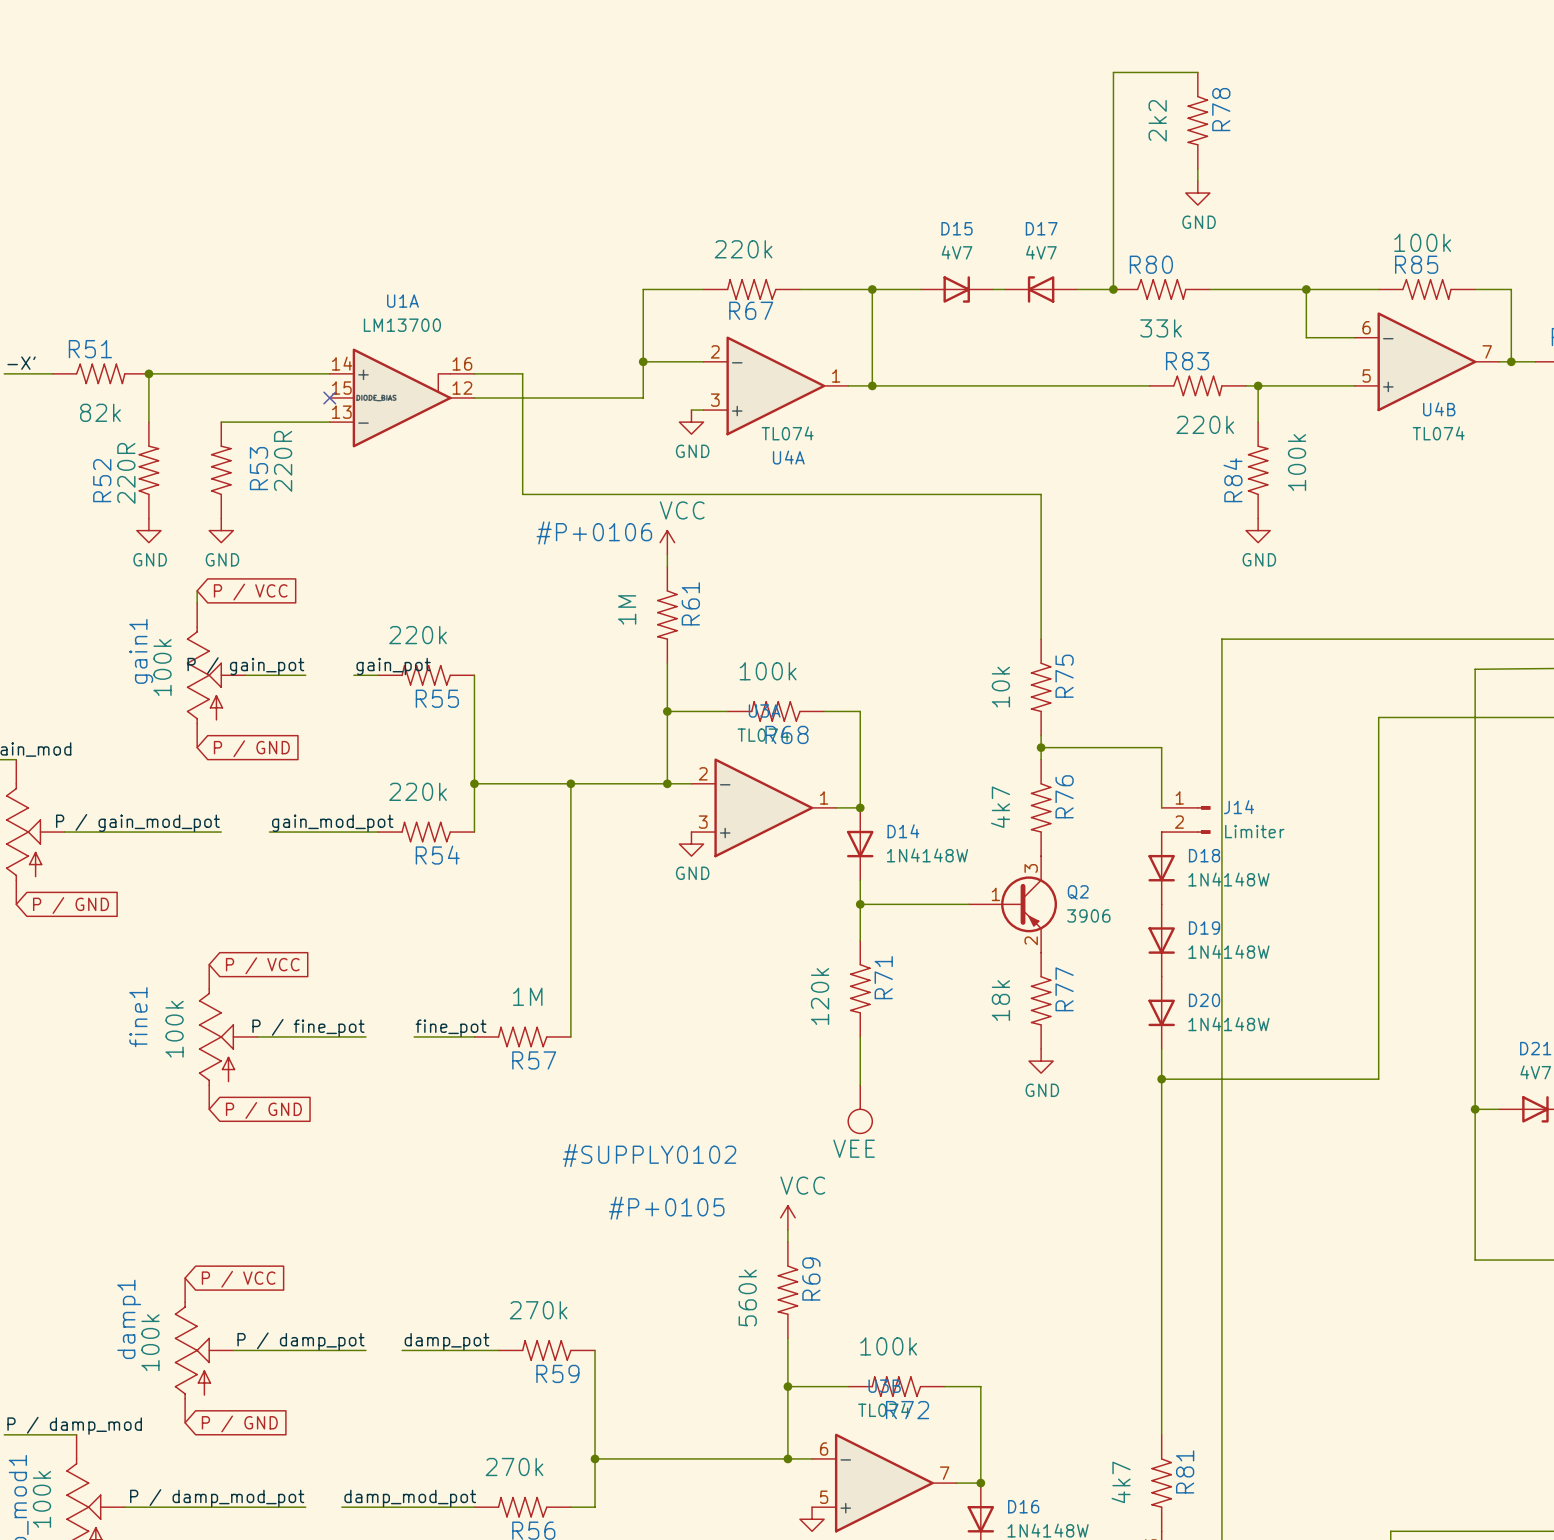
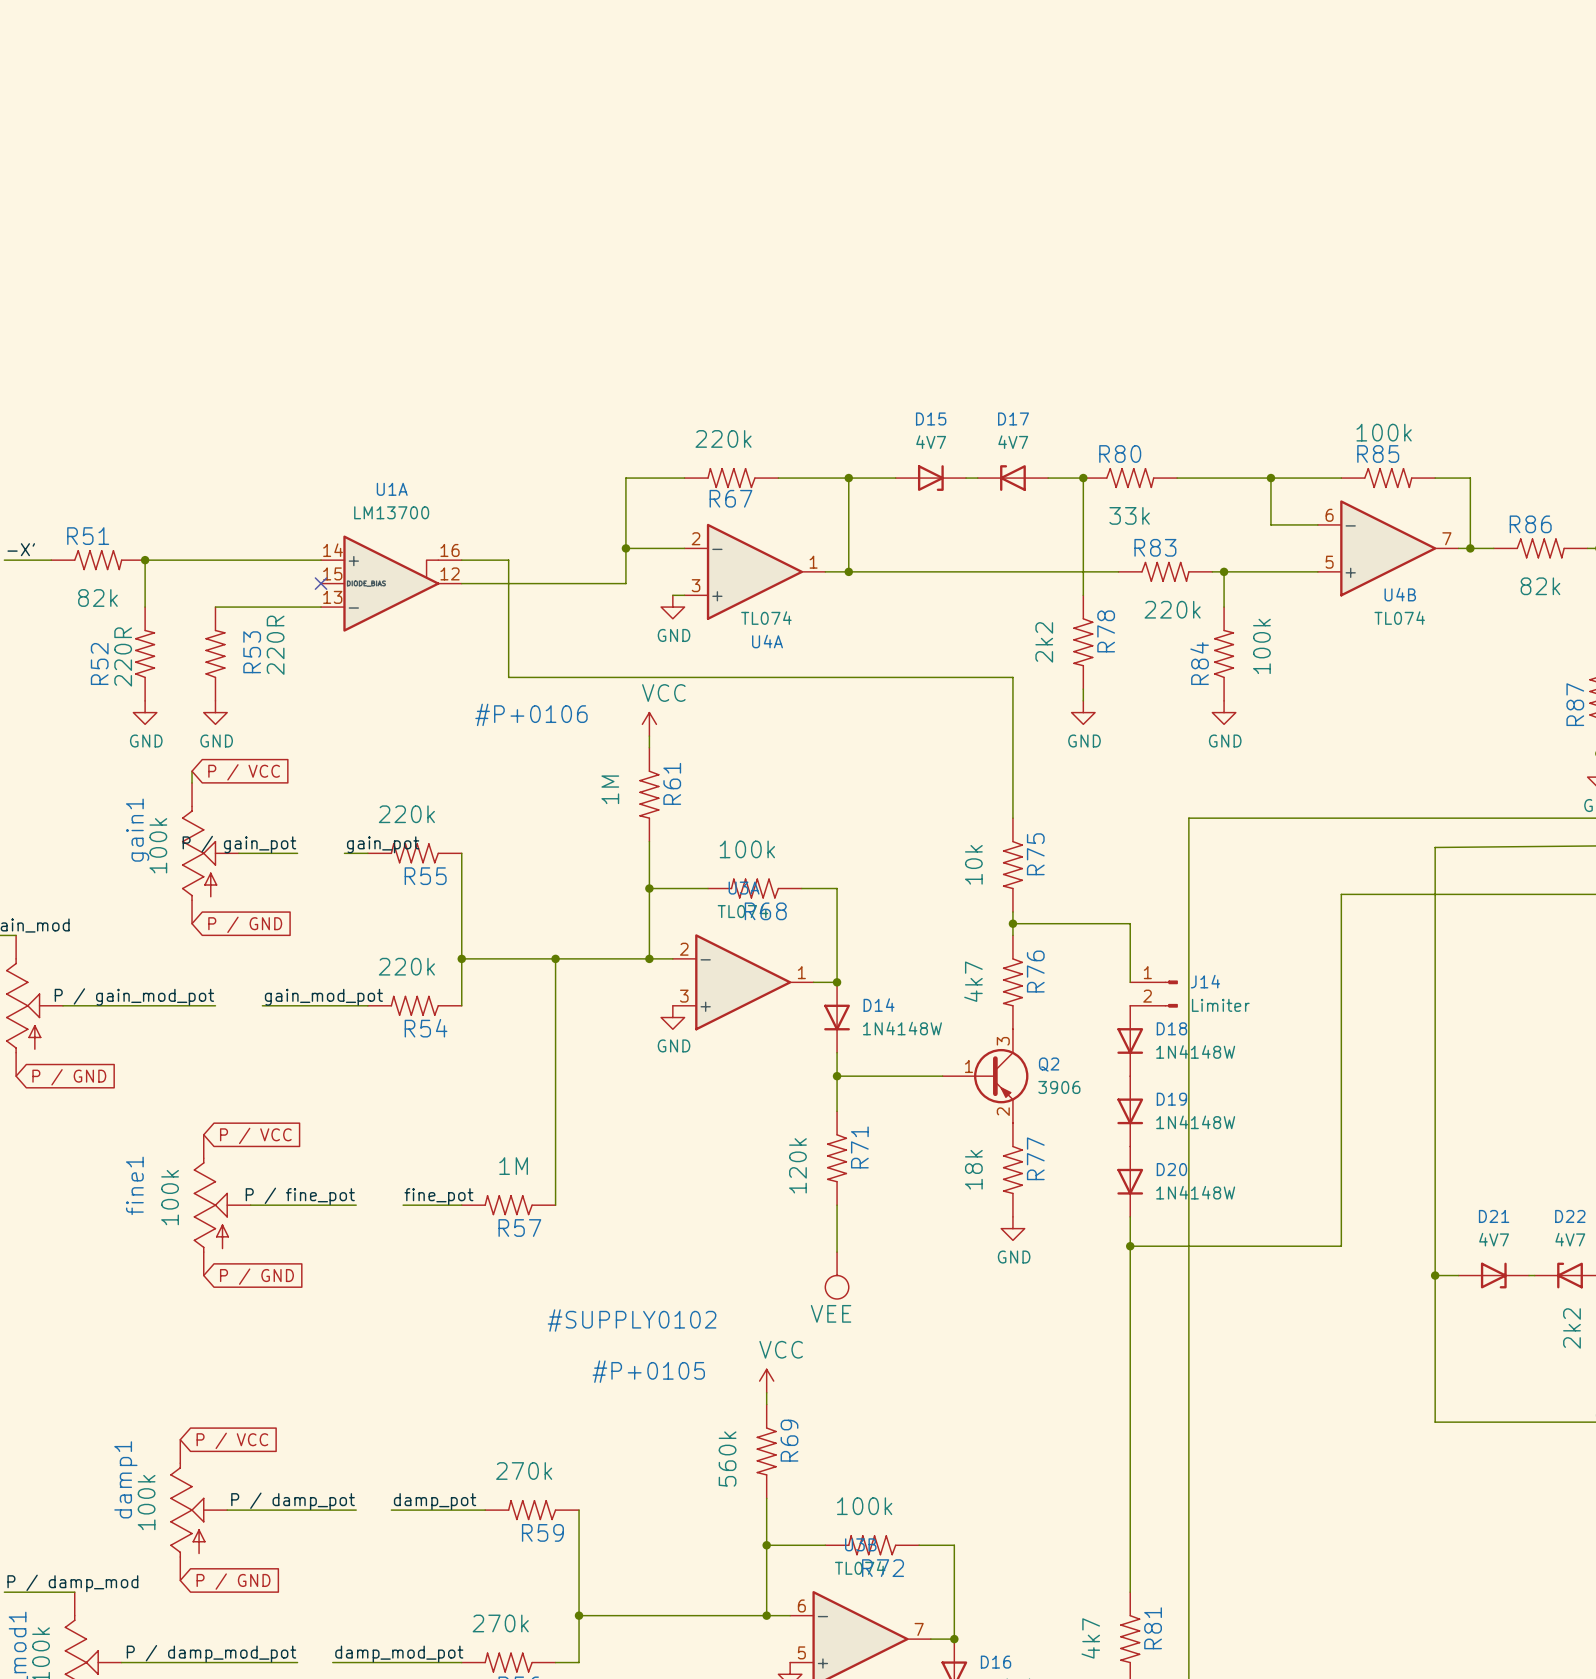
wire: (1197, 72) (1113, 72) (1113, 289) -> (1083, 595) (1083, 478)
R78 position: (1197, 120) -> (1083, 642)
wire: (1197, 168) (1197, 180) -> none
power symbol: GND (1197, 193) -> none
wire: none -> (1083, 689) (1083, 700)
power symbol: none -> GND (1083, 712)
#P+0106 name position: #P+0106 (594, 532) -> #P+0106 (531, 714)

